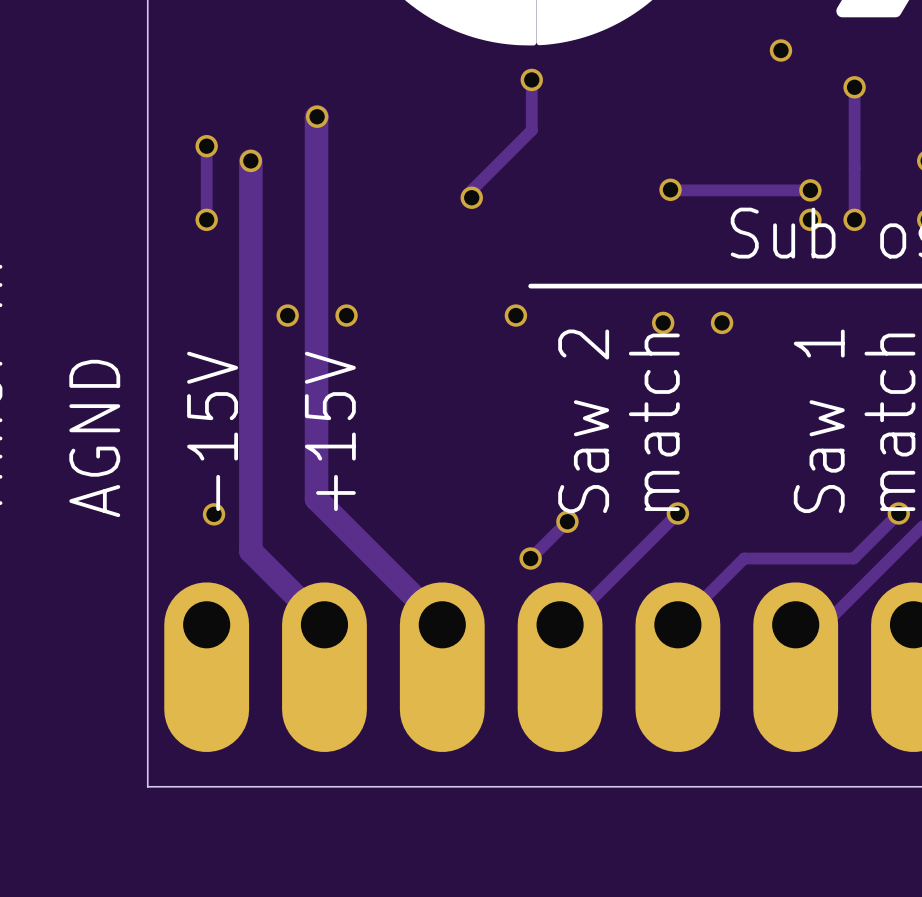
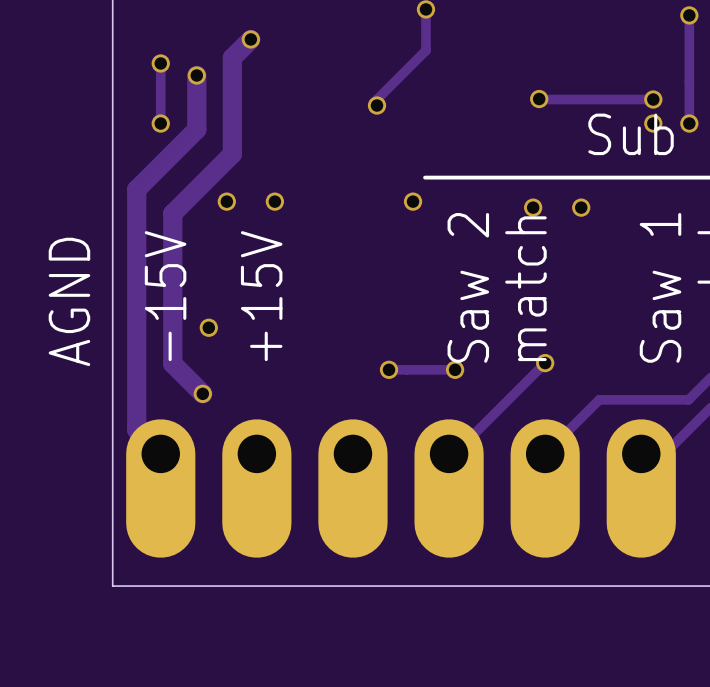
track: (316, 117) (316, 499) (442, 624) -> (250, 39) (232, 57) (232, 154) (172, 213) (172, 363) (202, 393)
track: (250, 227) (250, 551) (324, 624) -> (196, 129) (136, 189) (136, 429) (160, 453)
via: none -> (208, 327)
via: (214, 514) -> none
track: (567, 521) (530, 558) -> (455, 369) (389, 369)
via: none -> (202, 393)
via position: (530, 558) -> (389, 369)

